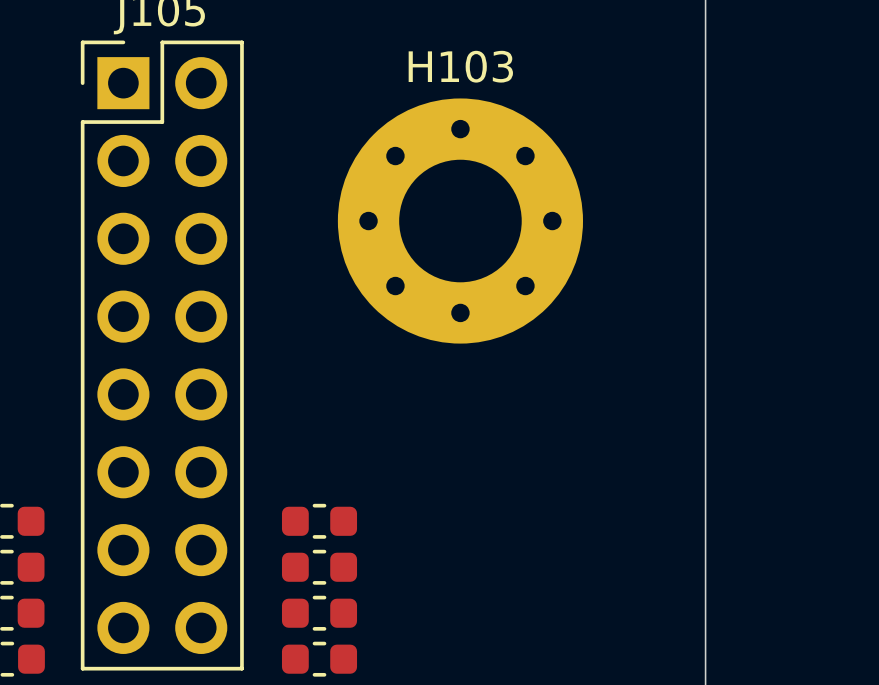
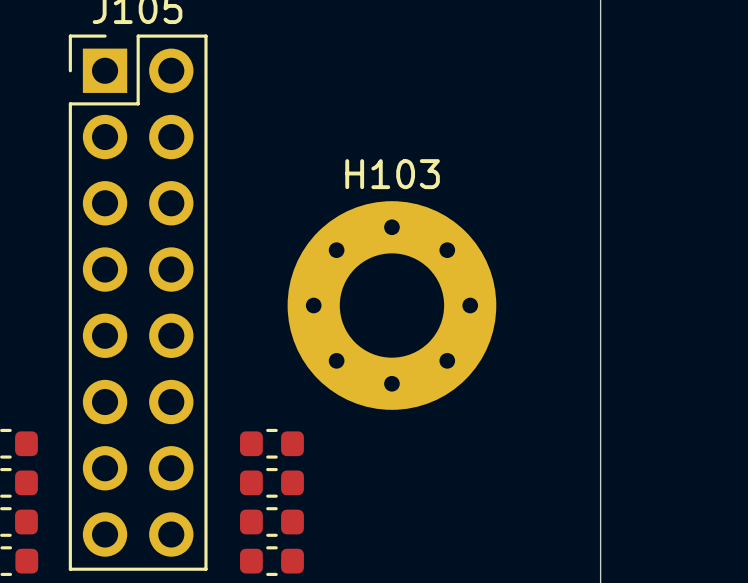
H103 position: (460, 221) -> (391, 305)

